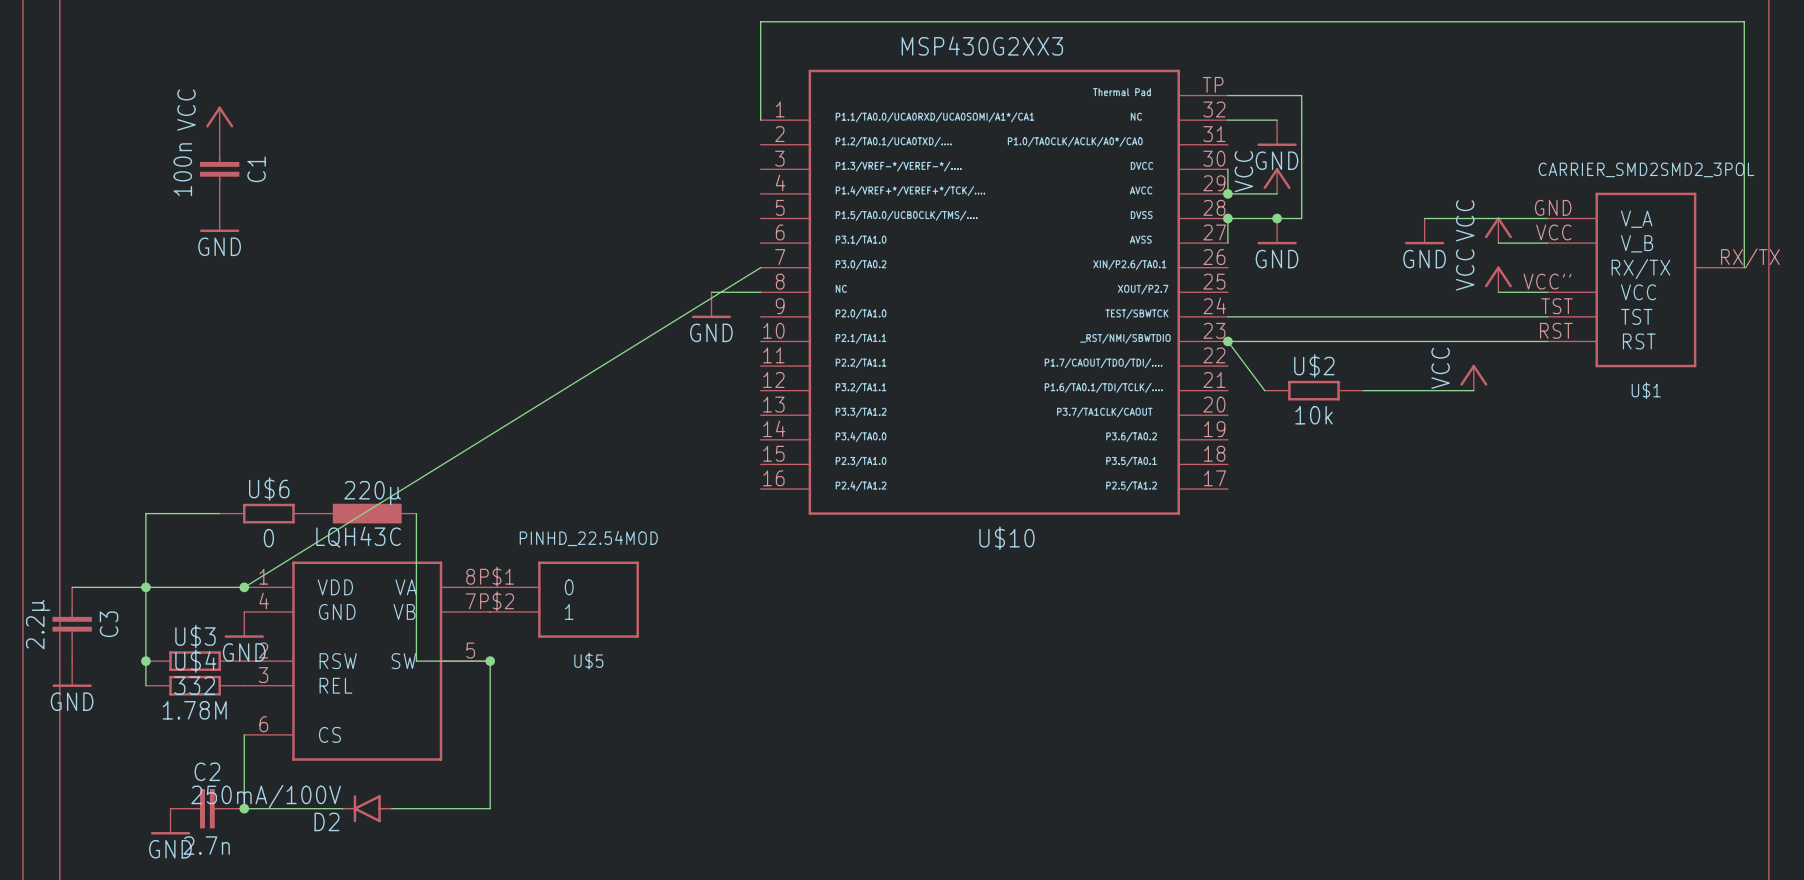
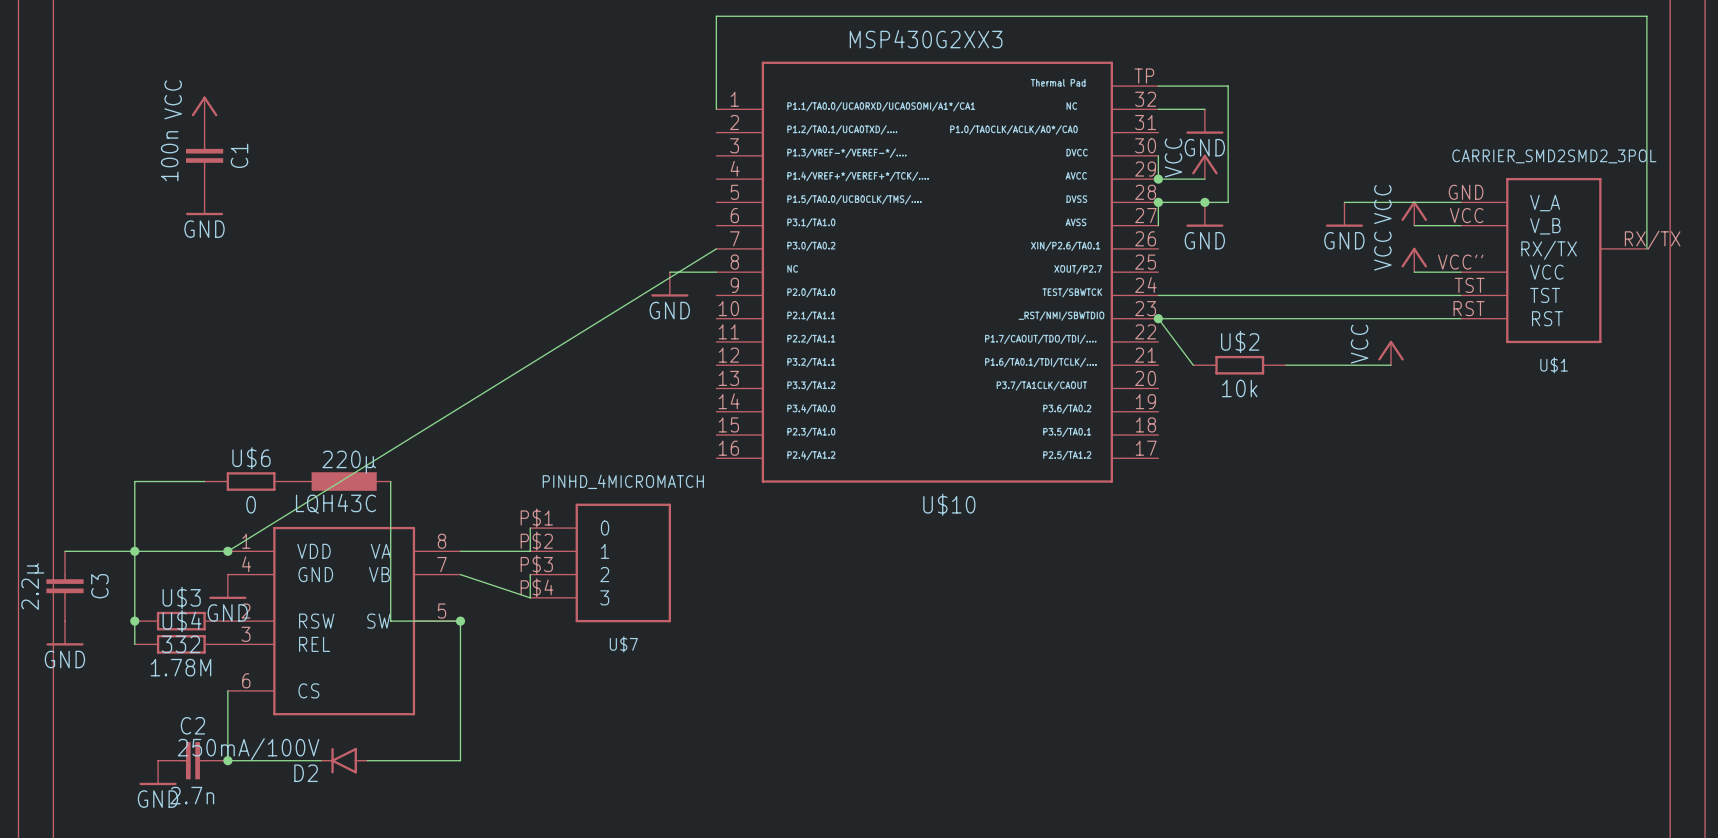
wire: none -> (530, 528) (530, 551) (460, 551)
U$5: PINHD_22.54MOD (564, 599) -> none
U$7: none -> PINHD_4MICROMATCH (600, 562)
wire: none -> (460, 574) (530, 597) (530, 574)

